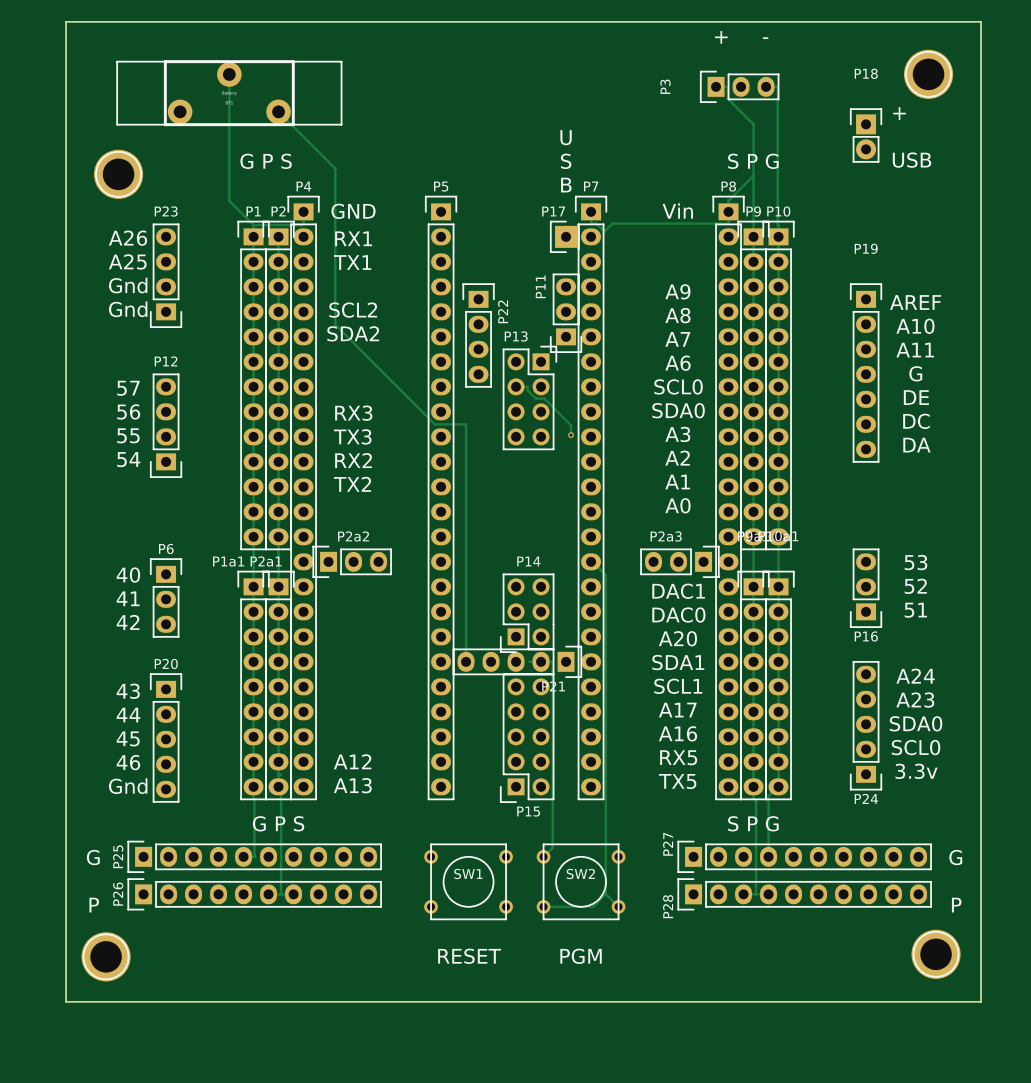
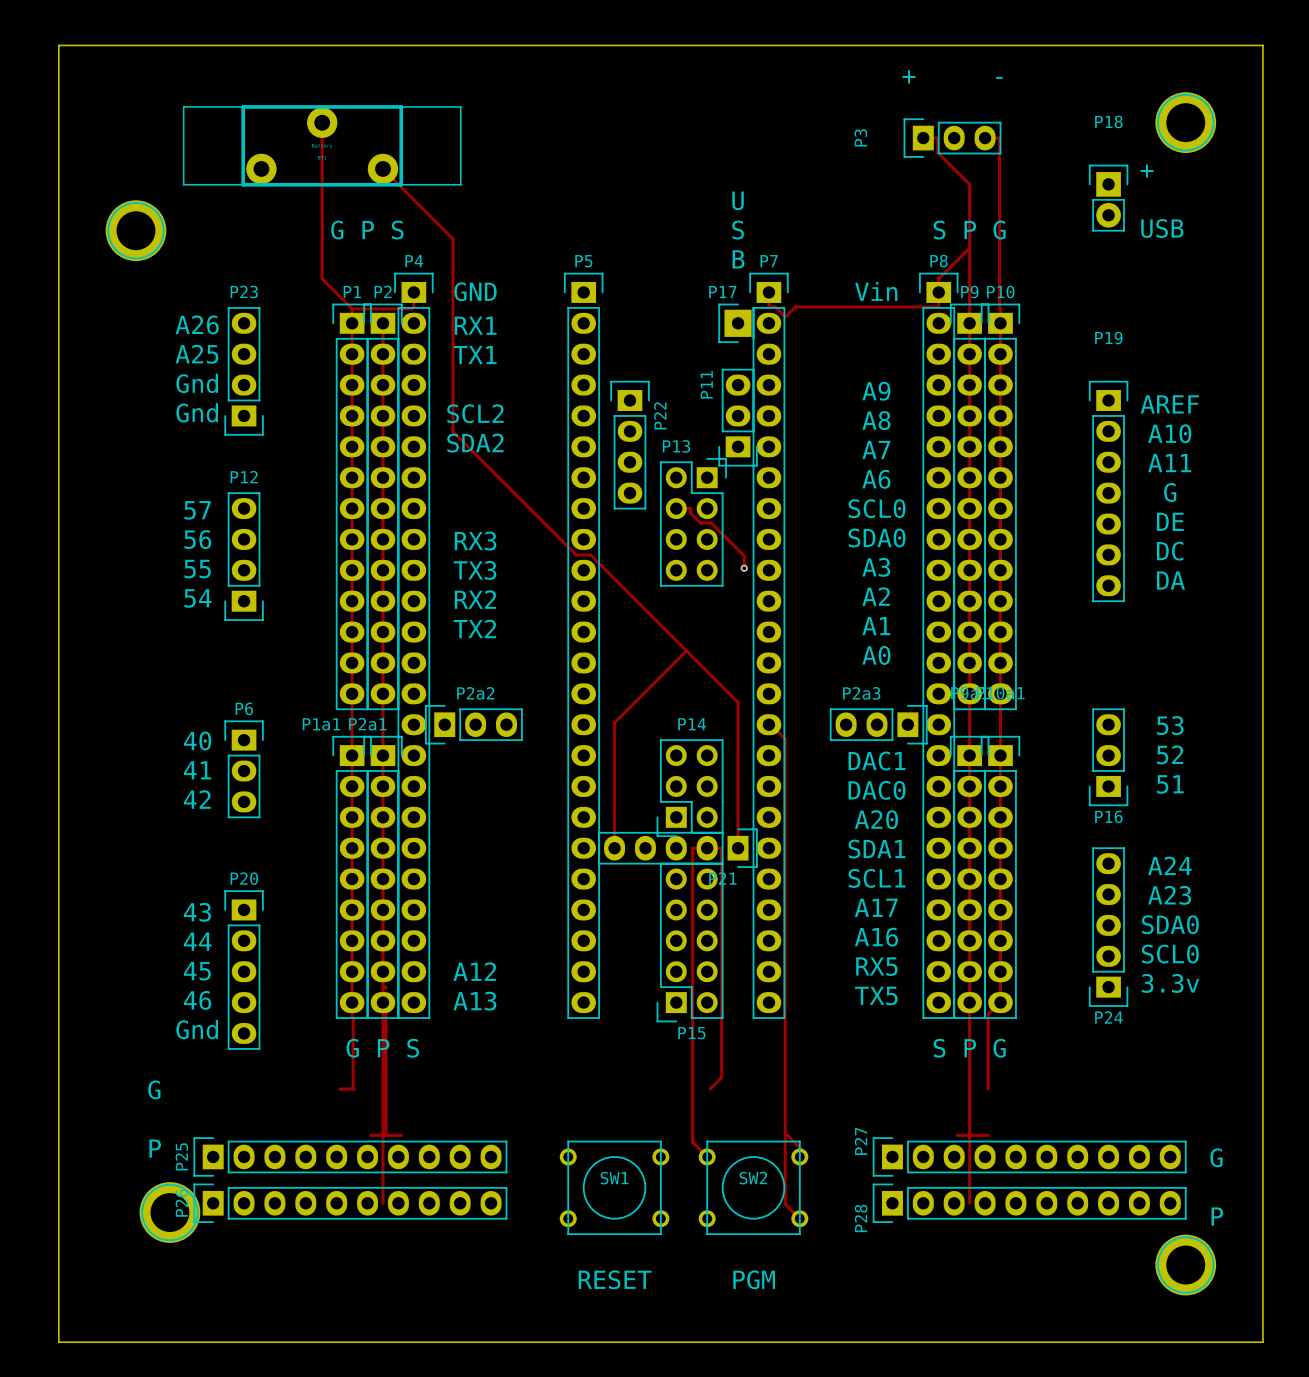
board edge: (66, 21) (66, 1001) (981, 1001) (981, 21) (66, 21) -> (58, 45) (58, 1342) (1262, 1342) (1262, 45) (58, 45)
part position: (118, 174) -> (135, 230)
track: (446, 424) (466, 424) (466, 560) -> (590, 554) (686, 650)
track: none -> (686, 650) (614, 722)
track: none -> (686, 650) (738, 702) (738, 848)
track: (592, 561) (605, 575) (605, 894) (593, 906) (543, 906) -> (770, 724) (785, 739) (785, 1204) (799, 1218)
track: none -> (692, 848) (692, 1142) (707, 1156)
text position: 43 (128, 691) -> 43 (197, 912)
text position: 44 (128, 715) -> 44 (197, 941)
P20 position: (166, 737) -> (244, 970)
text position: 45 (128, 738) -> 45 (197, 971)
text position: 46 (128, 762) -> 46 (197, 1000)
text position: Gnd (128, 786) -> Gnd (197, 1029)
track: none -> (383, 1002) (383, 1203)
track: (753, 798) (756, 801) (756, 894) -> (969, 1017) (969, 1203)
P25 position: (254, 856) -> (350, 1156)
P27 position: (804, 856) -> (1029, 1156)
text position: G (955, 857) -> G (1216, 1157)
SW1 position: (468, 881) -> (614, 1187)
SW2 position: (581, 881) -> (753, 1187)
P26 position: (254, 894) -> (350, 1203)
P28 position: (804, 894) -> (1029, 1203)
text position: P (956, 905) -> P (1217, 1216)
part position: (936, 954) -> (1185, 1265)
text position: RESET (469, 956) -> RESET (615, 1279)
text position: PGM (581, 956) -> PGM (754, 1279)

